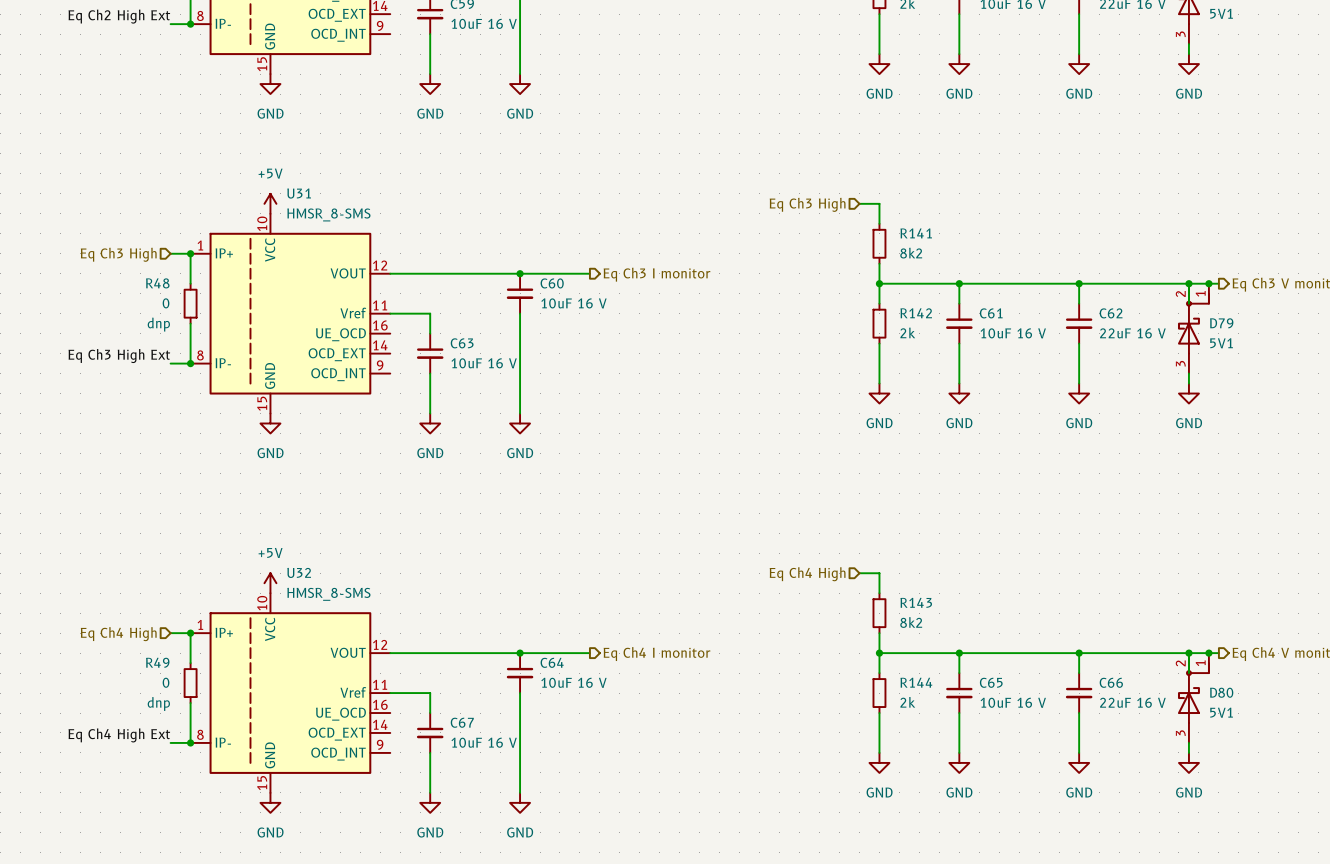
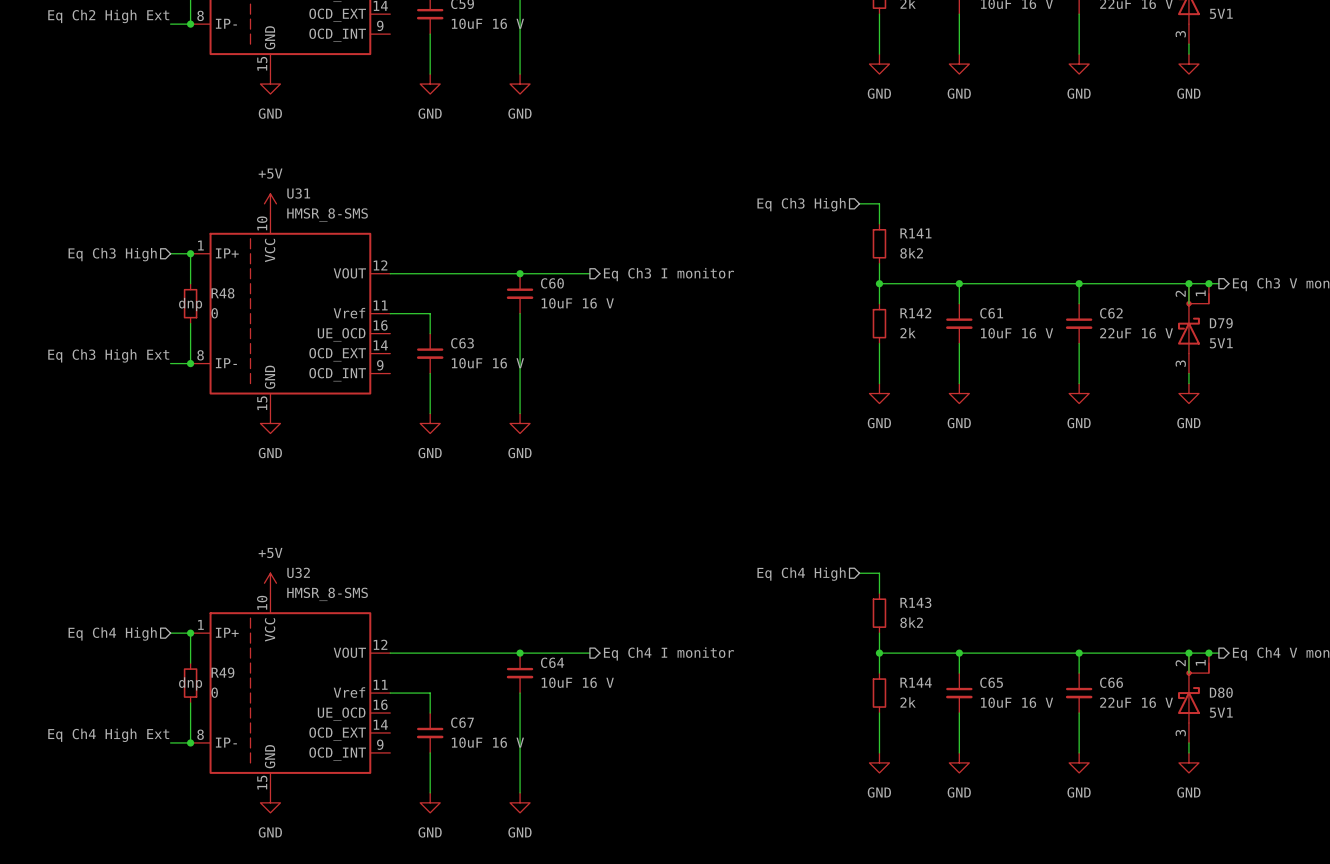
R48 name position: R48 (157, 283) -> R48 (222, 293)
R48 value position: 0 (166, 303) -> 0 (214, 313)
R48 text position: dnp (158, 324) -> dnp (190, 304)
R49 name position: R49 (157, 662) -> R49 (222, 672)
R49 value position: 0 (166, 682) -> 0 (214, 692)
R49 text position: dnp (158, 703) -> dnp (190, 683)

